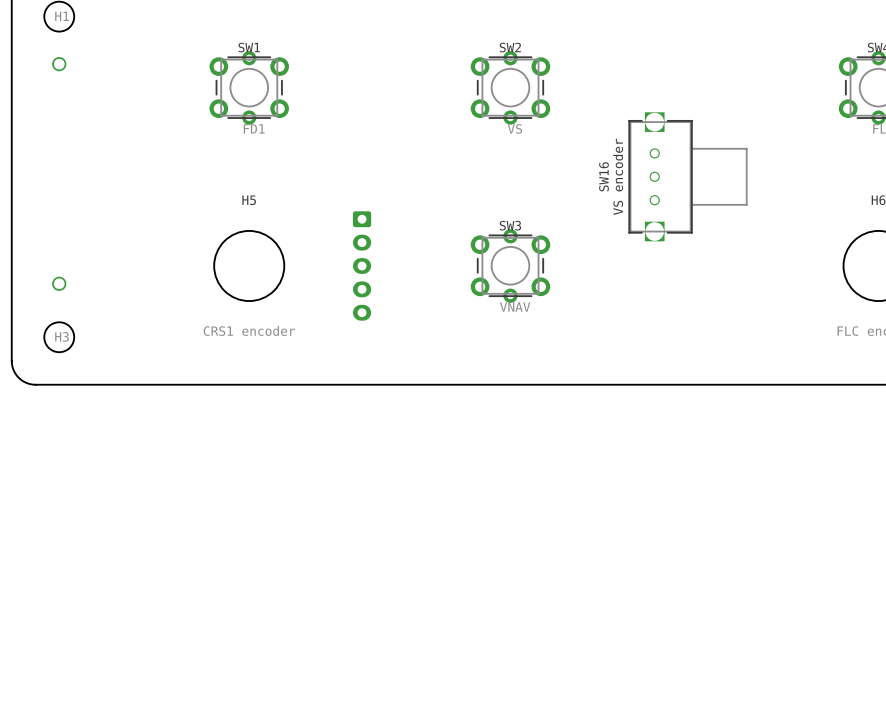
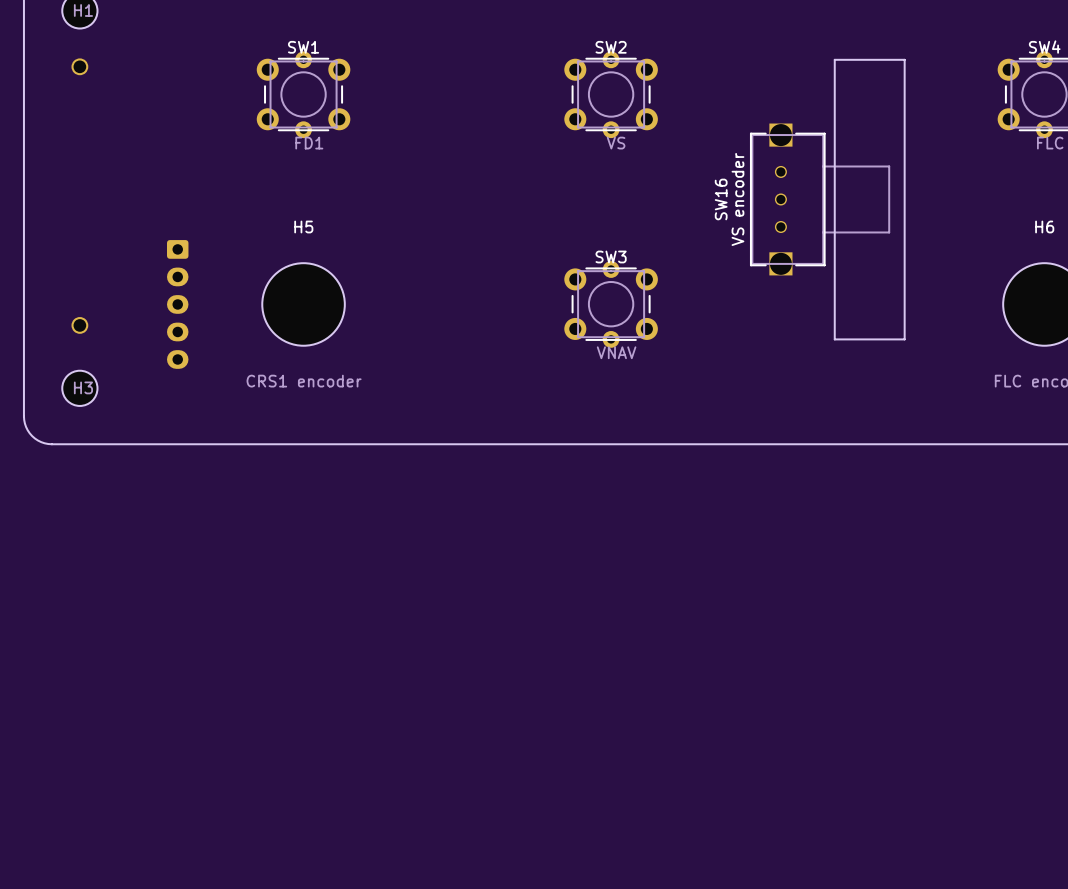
board edge: none -> (834, 59) (904, 59) (904, 339) (834, 339) (834, 59)
part position: (362, 265) -> (177, 304)

